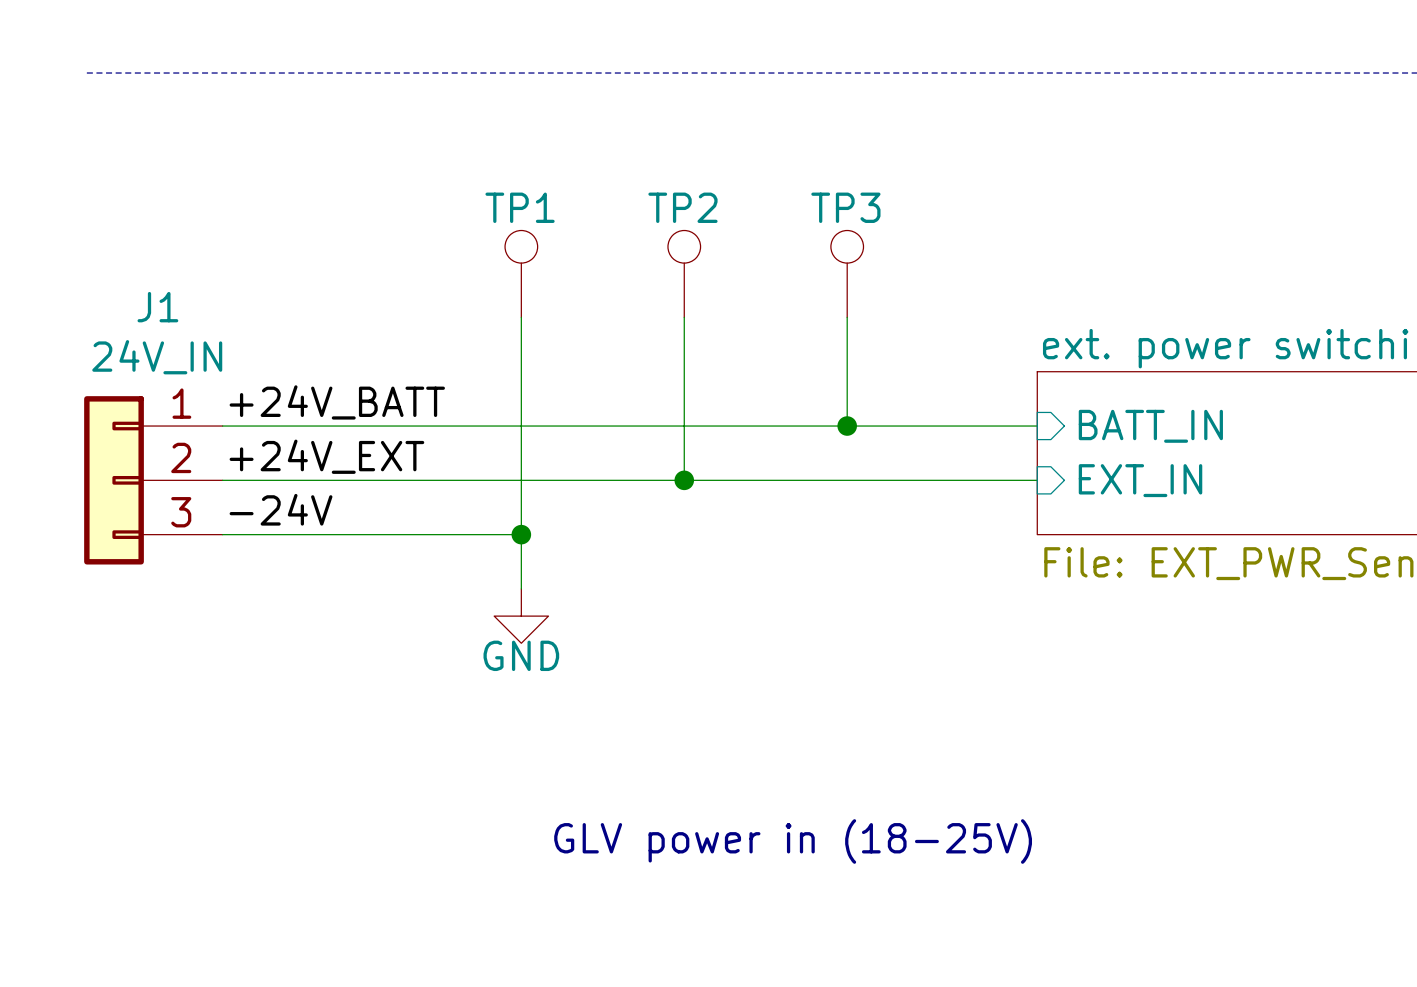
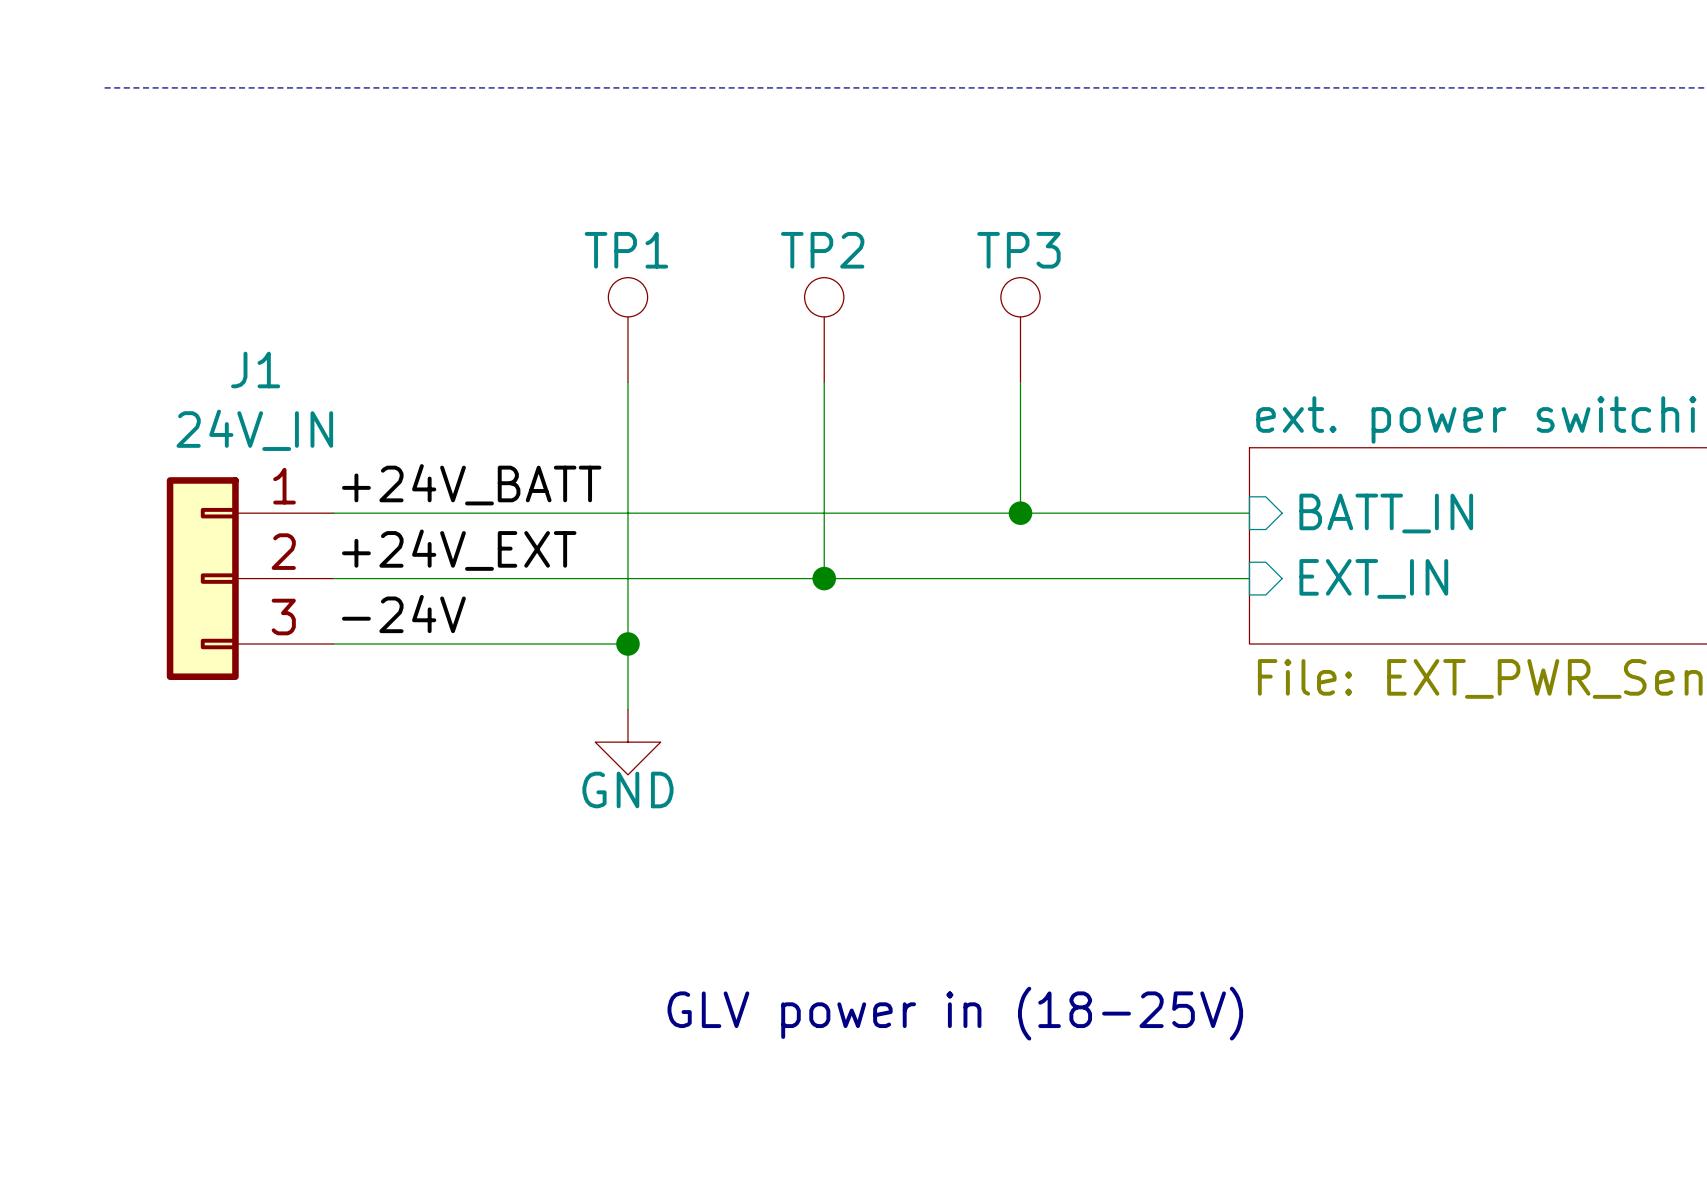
label position: +24V_BATT (337, 402) -> +24V_BATT (471, 484)
label position: +24V_EXT (326, 456) -> +24V_EXT (459, 550)
J1 position: (153, 480) -> (250, 578)
label position: -24V (281, 509) -> -24V (403, 614)

